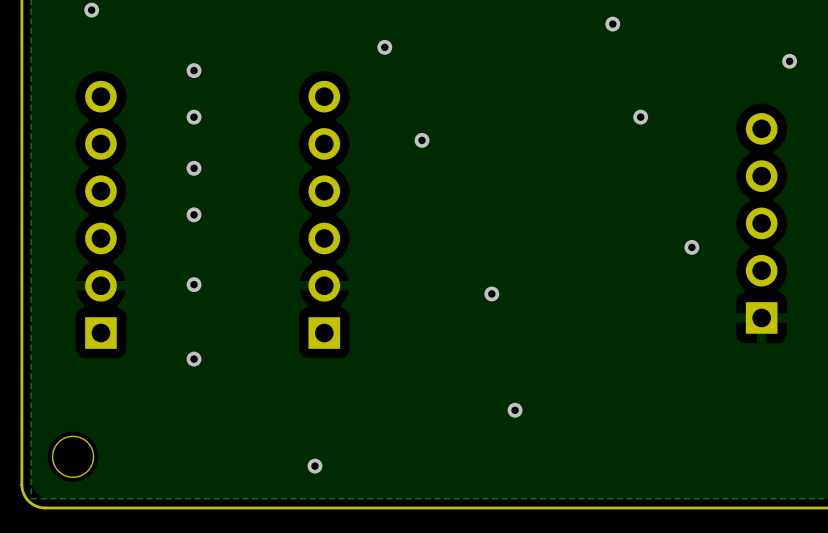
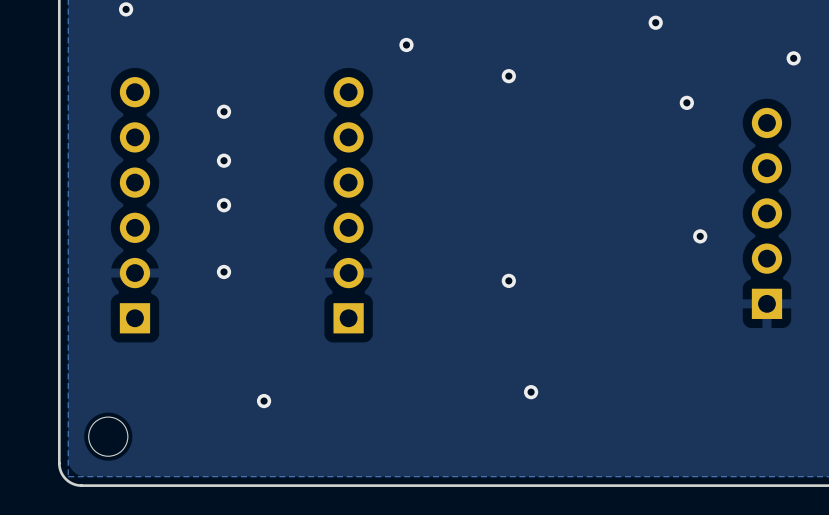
via position: (612, 24) -> (655, 22)
via: (194, 70) -> none
via: none -> (508, 76)
via position: (640, 117) -> (686, 102)
via: (422, 140) -> none
via: (194, 359) -> none
via: none -> (264, 401)
via: (315, 466) -> none

